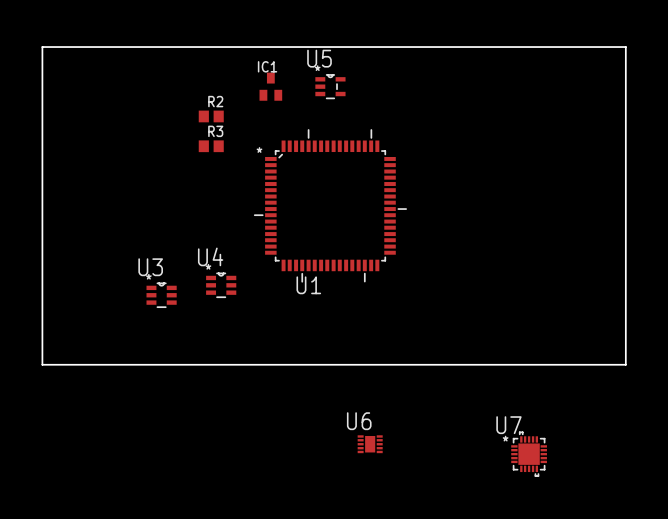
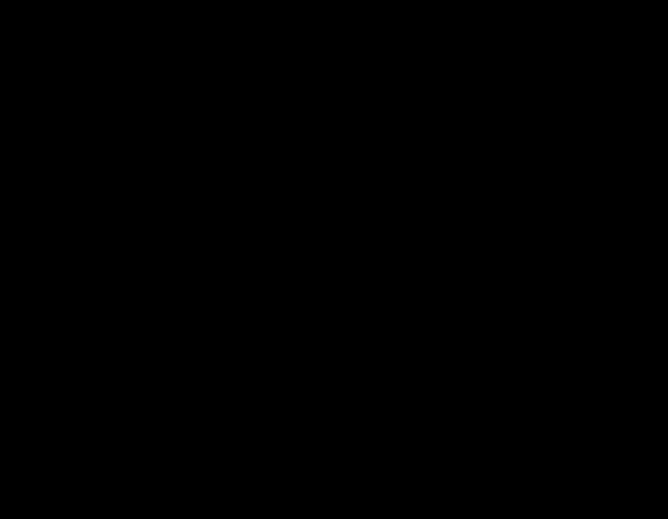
board edge: (42, 47) (42, 364) (625, 364) (625, 47) (42, 47) -> none
IC1: (270, 86) -> none
U5: (330, 86) -> none
R2: (211, 116) -> none
R3: (211, 146) -> none
U1: (330, 205) -> none
U4: (221, 285) -> none
U3: (161, 295) -> none
U6: (370, 444) -> none
U7: (529, 454) -> none

